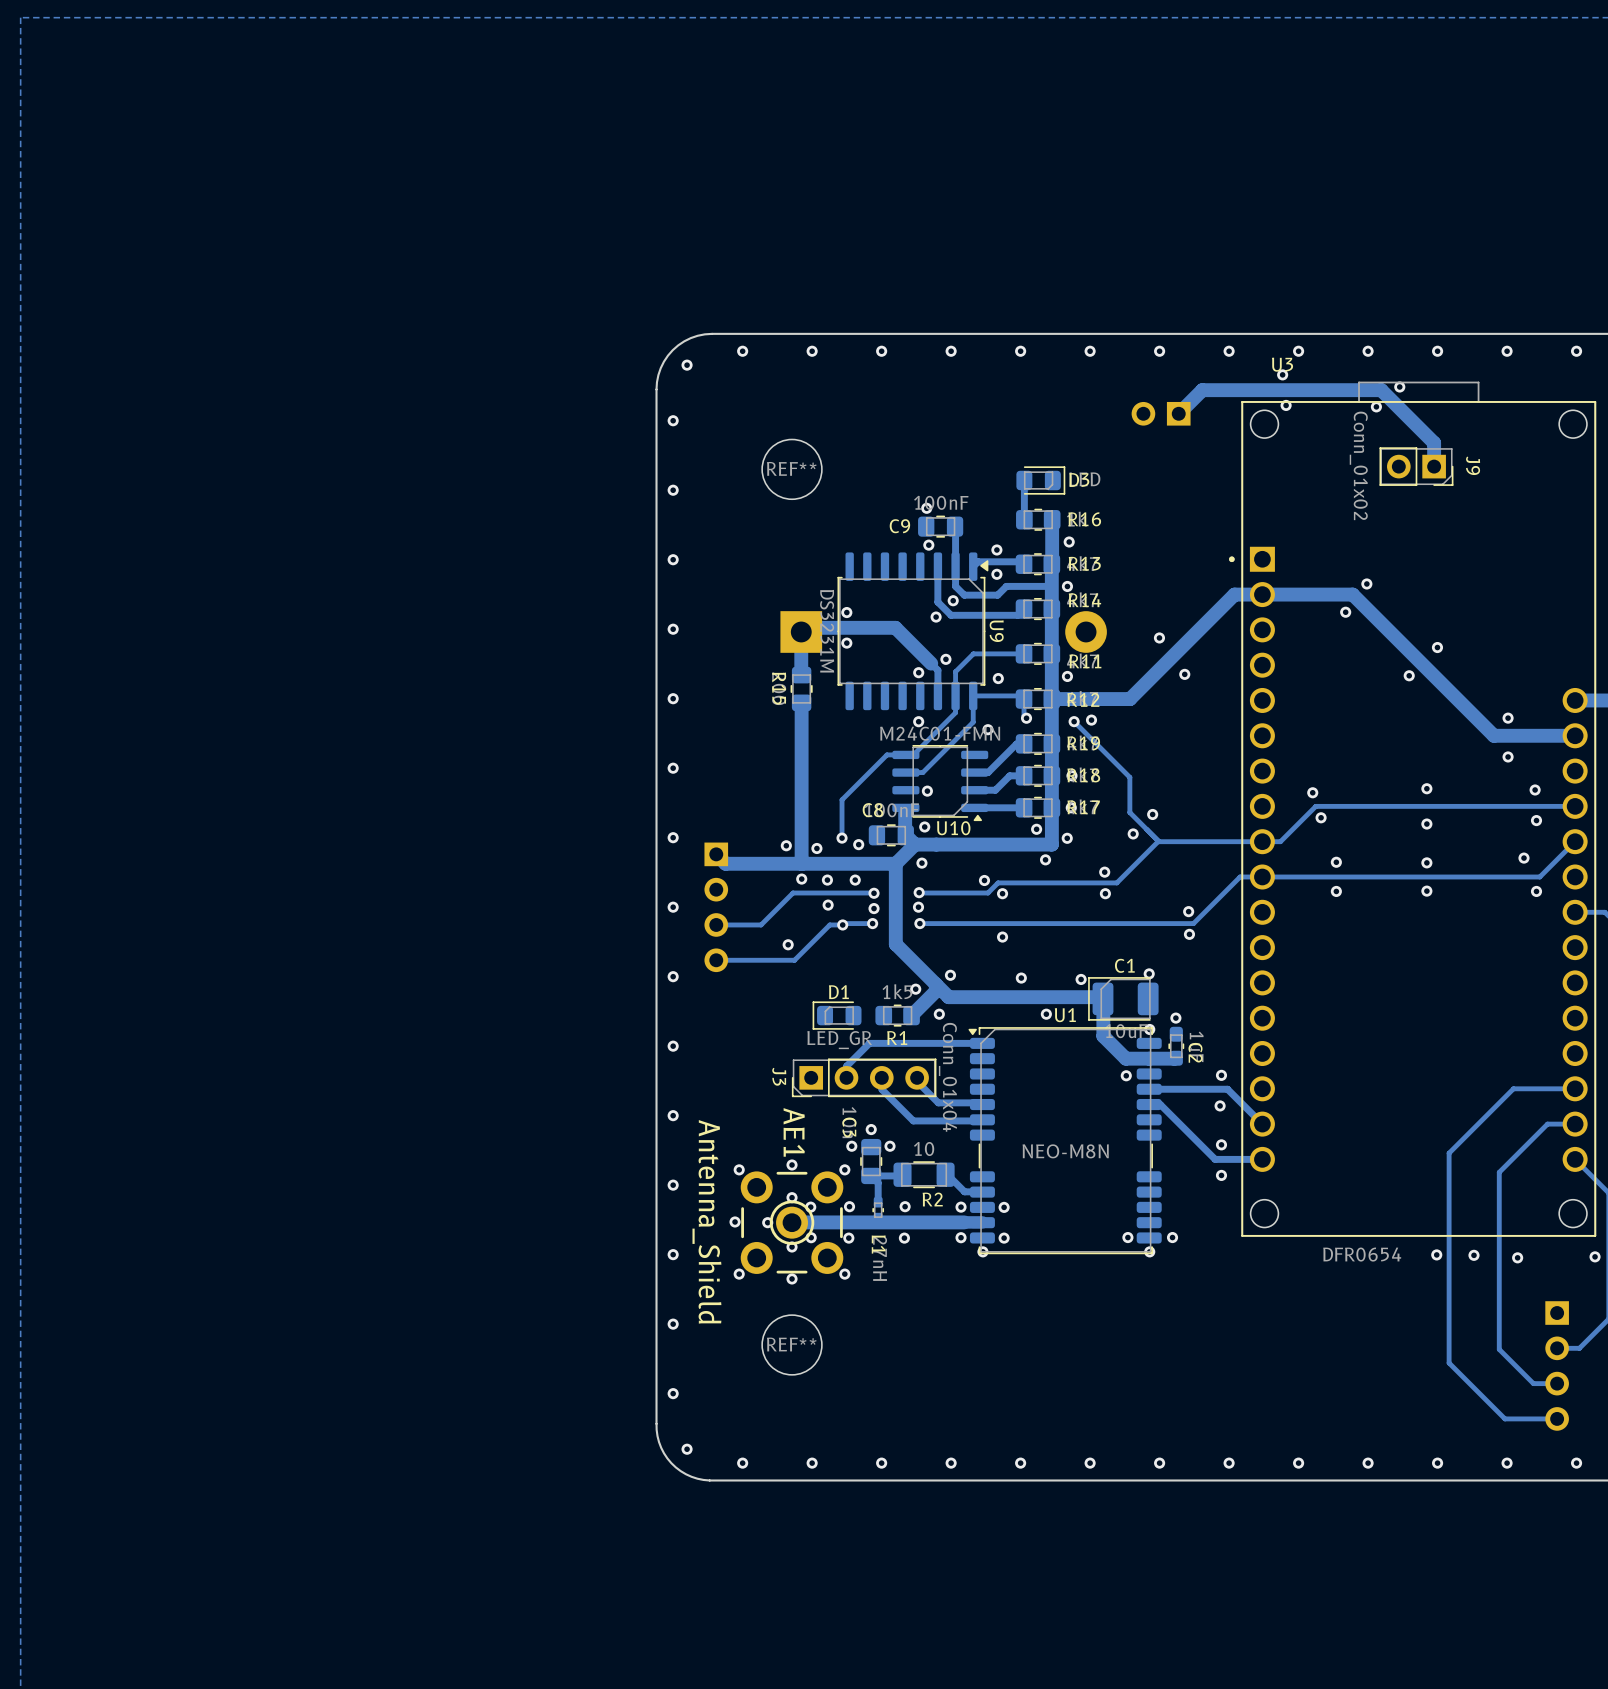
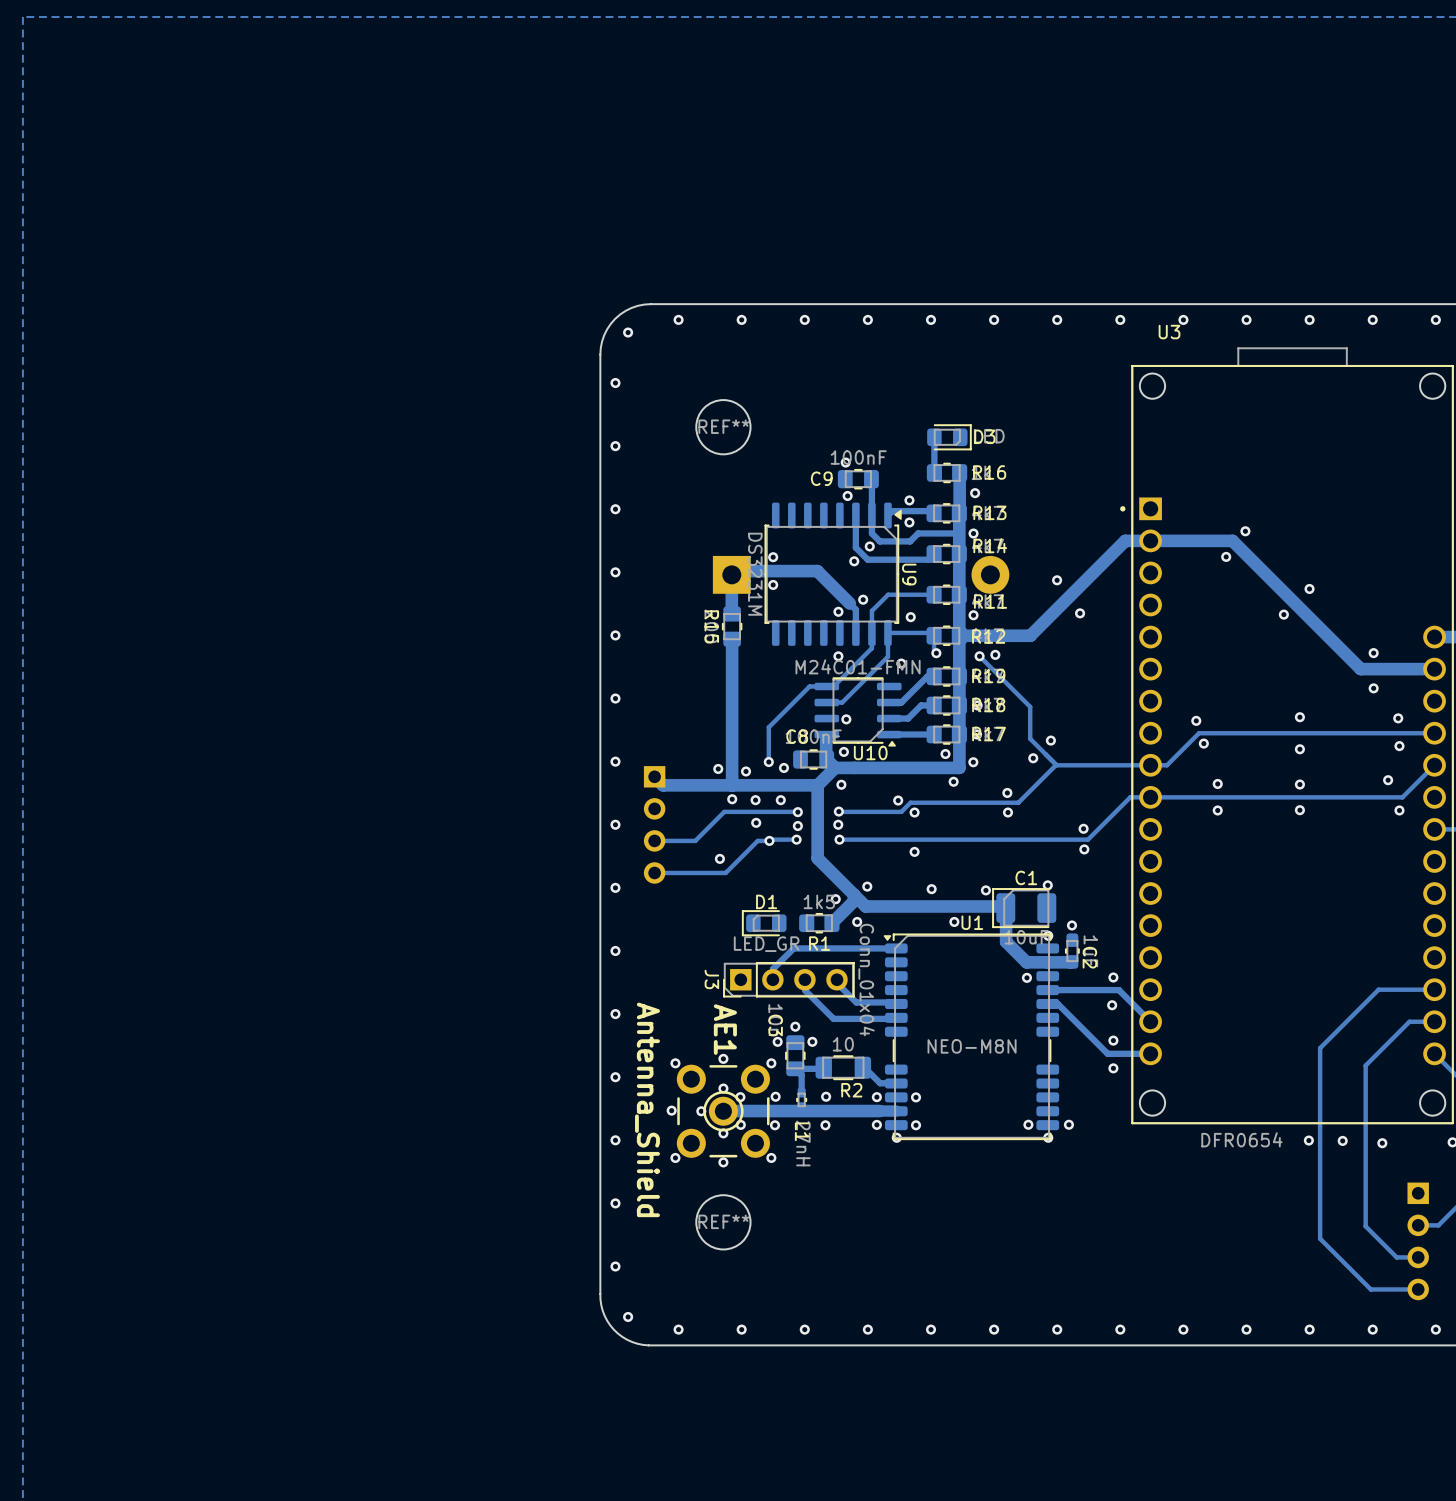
via: (1282, 374) -> none
via: (1399, 386) -> none
via: (1286, 405) -> none
via: (1376, 406) -> none
part: (1161, 413) -> none
track: (1178, 413) (1202, 390) (1381, 390) (1434, 442) (1434, 466) -> none
J9: Conn_01x02 (1416, 466) -> none

